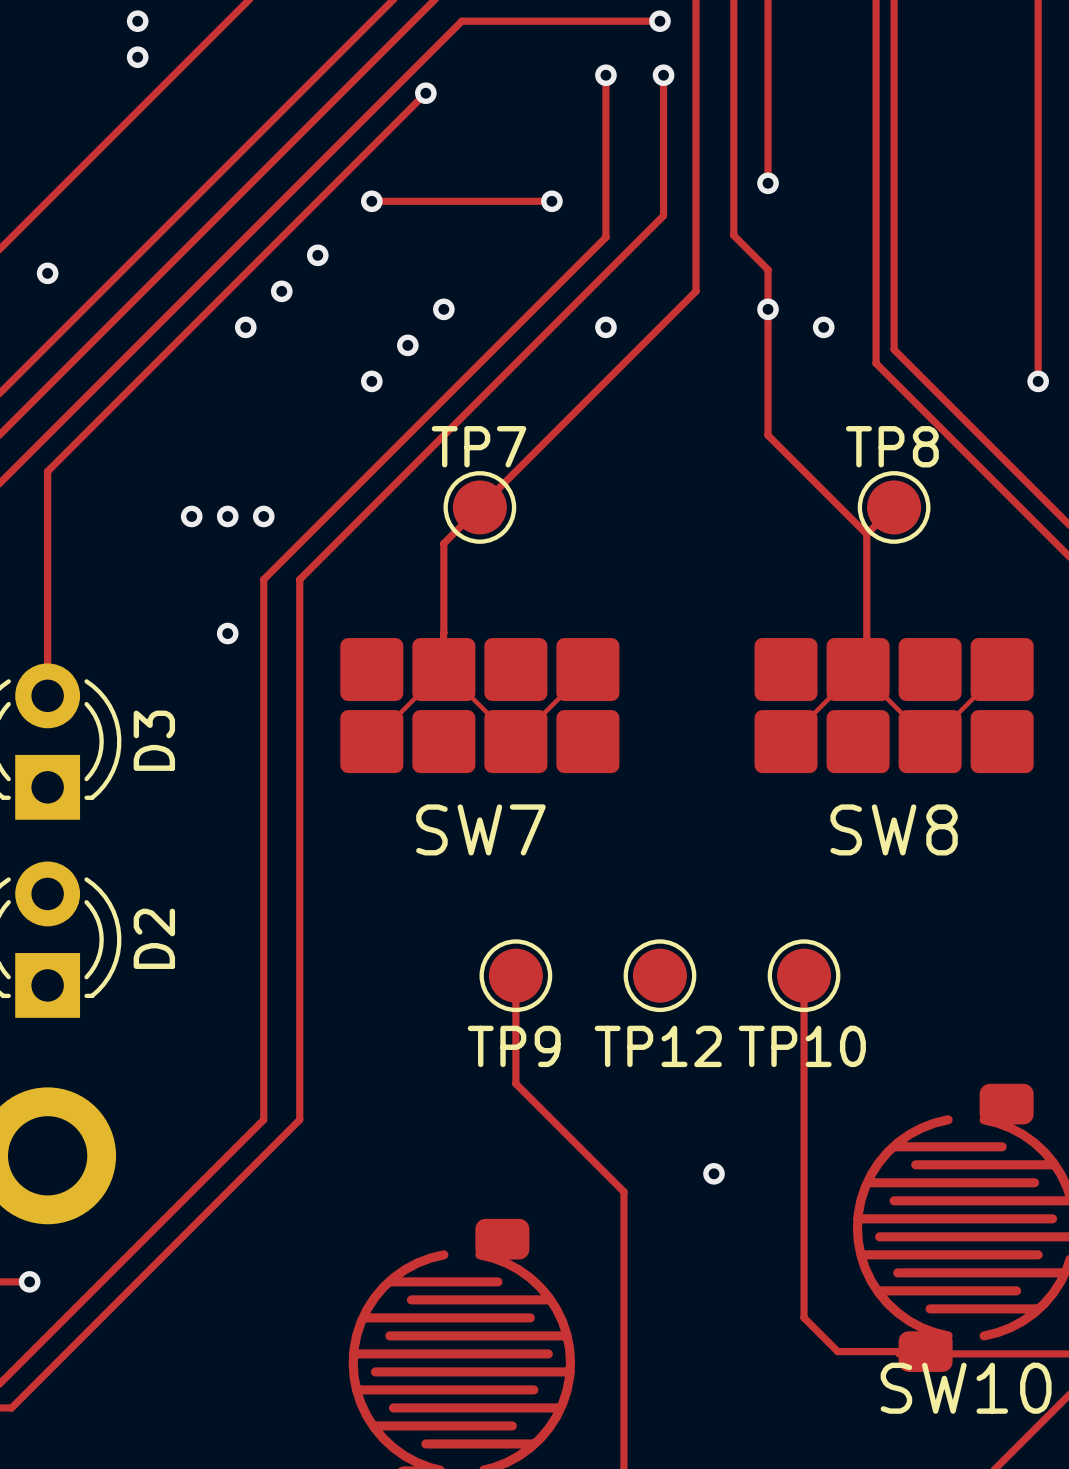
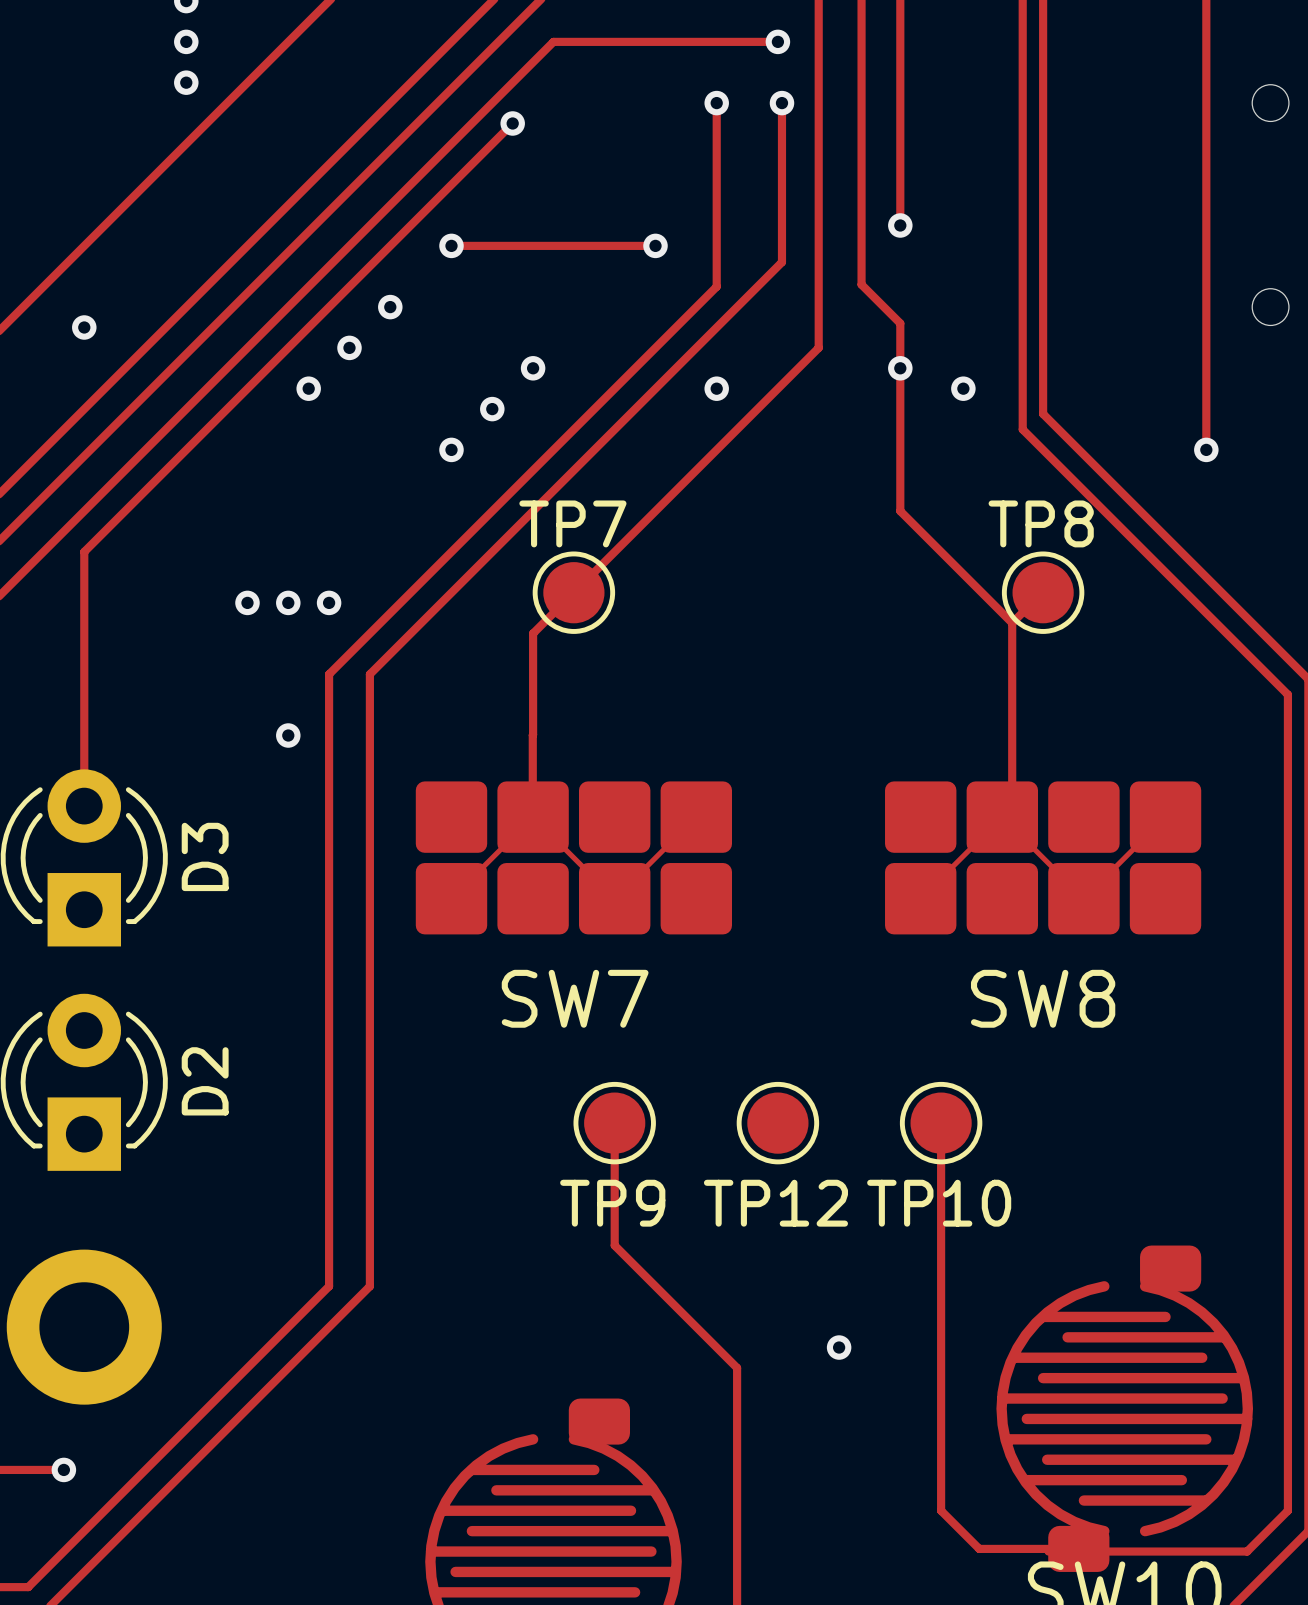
SW7 position: (479, 705) -> (573, 857)
SW8 position: (894, 705) -> (1043, 857)

